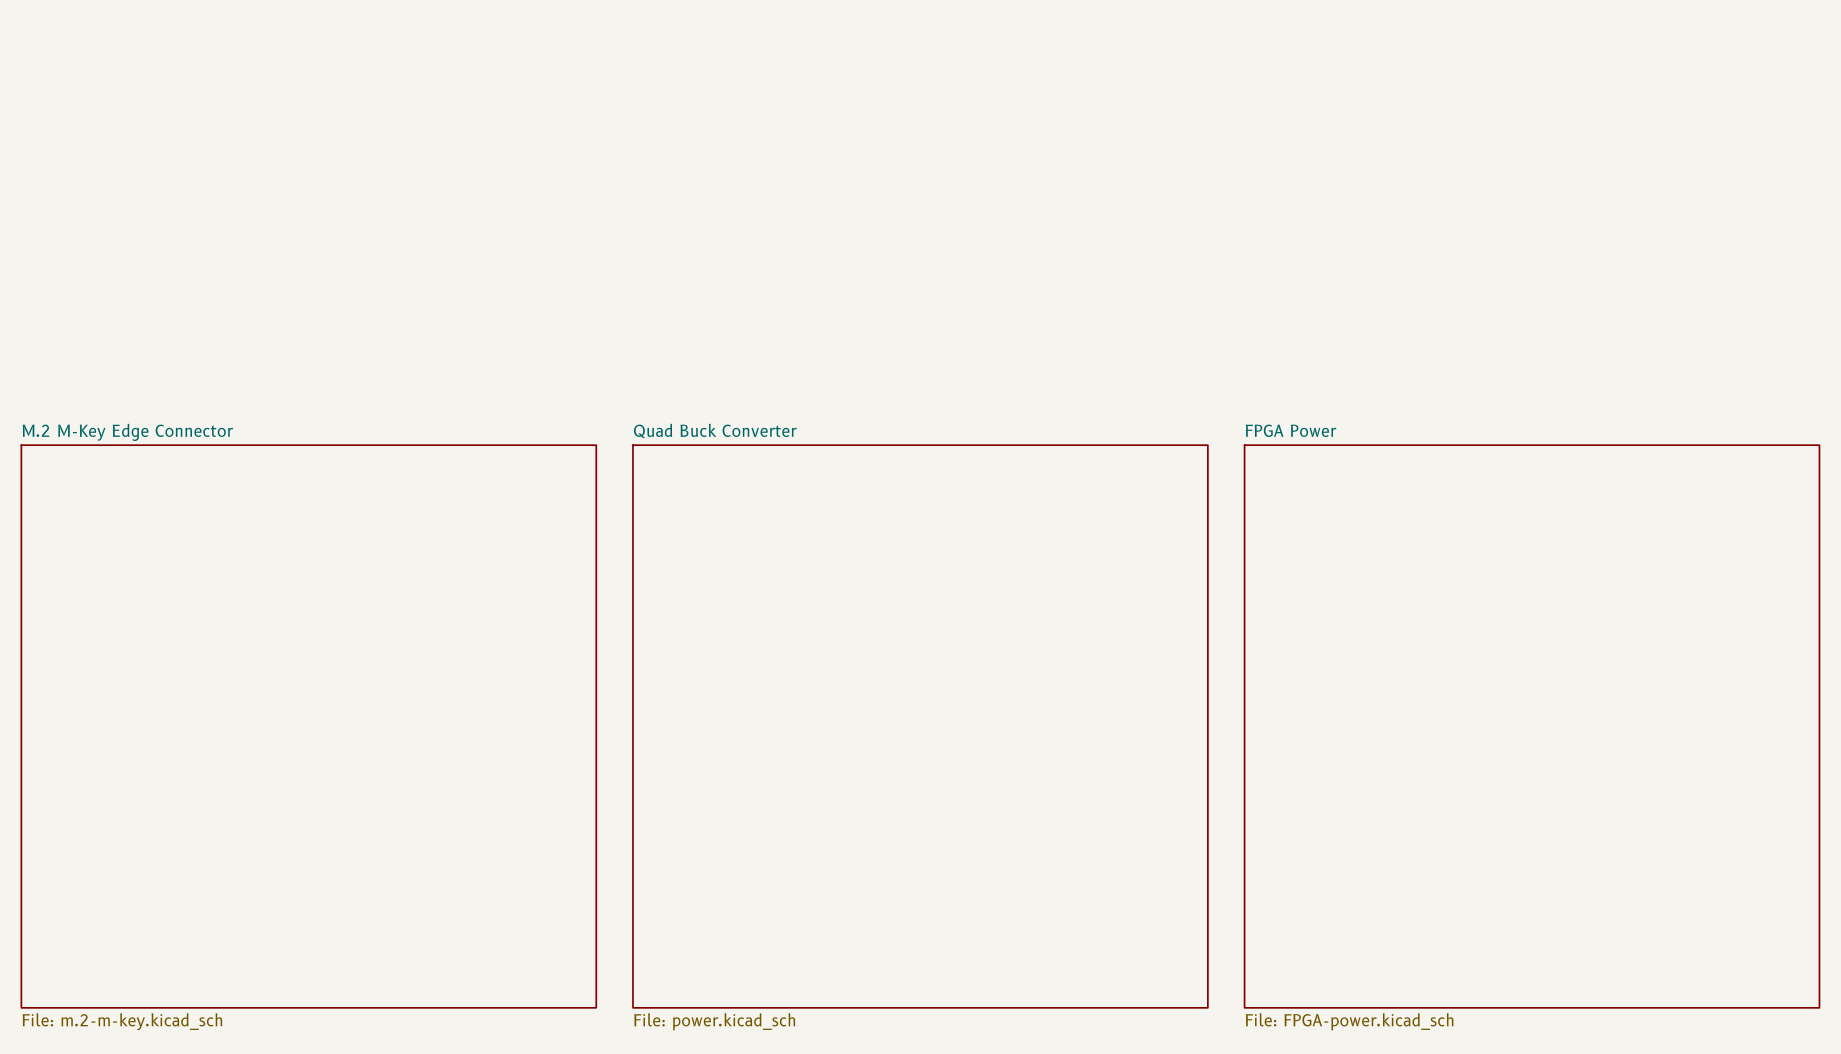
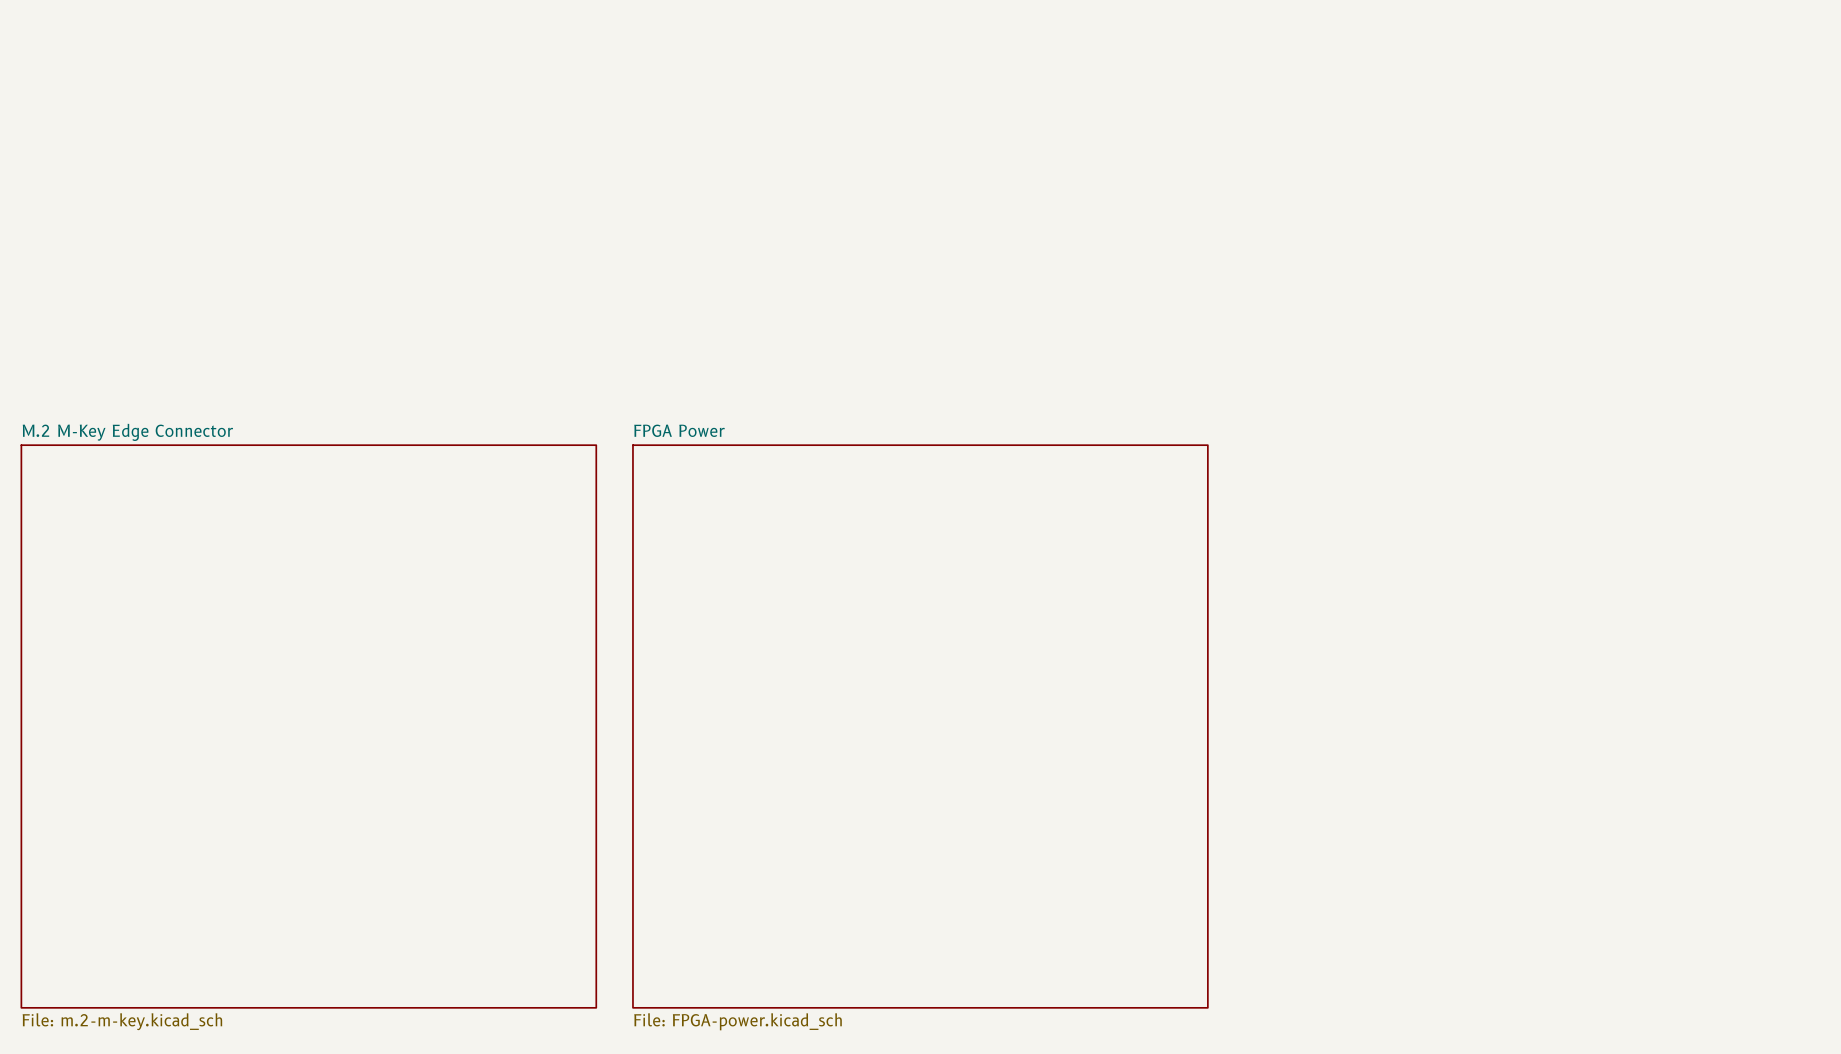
sheet Quad Buck Converter name: Quad Buck Converter (715, 430) -> FPGA Power (679, 430)
sheet FPGA Power: File: FPGA-power.kicad_sch (1532, 726) -> none
sheet Quad Buck Converter value: File: power.kicad_sch (714, 1021) -> File: FPGA-power.kicad_sch (738, 1021)

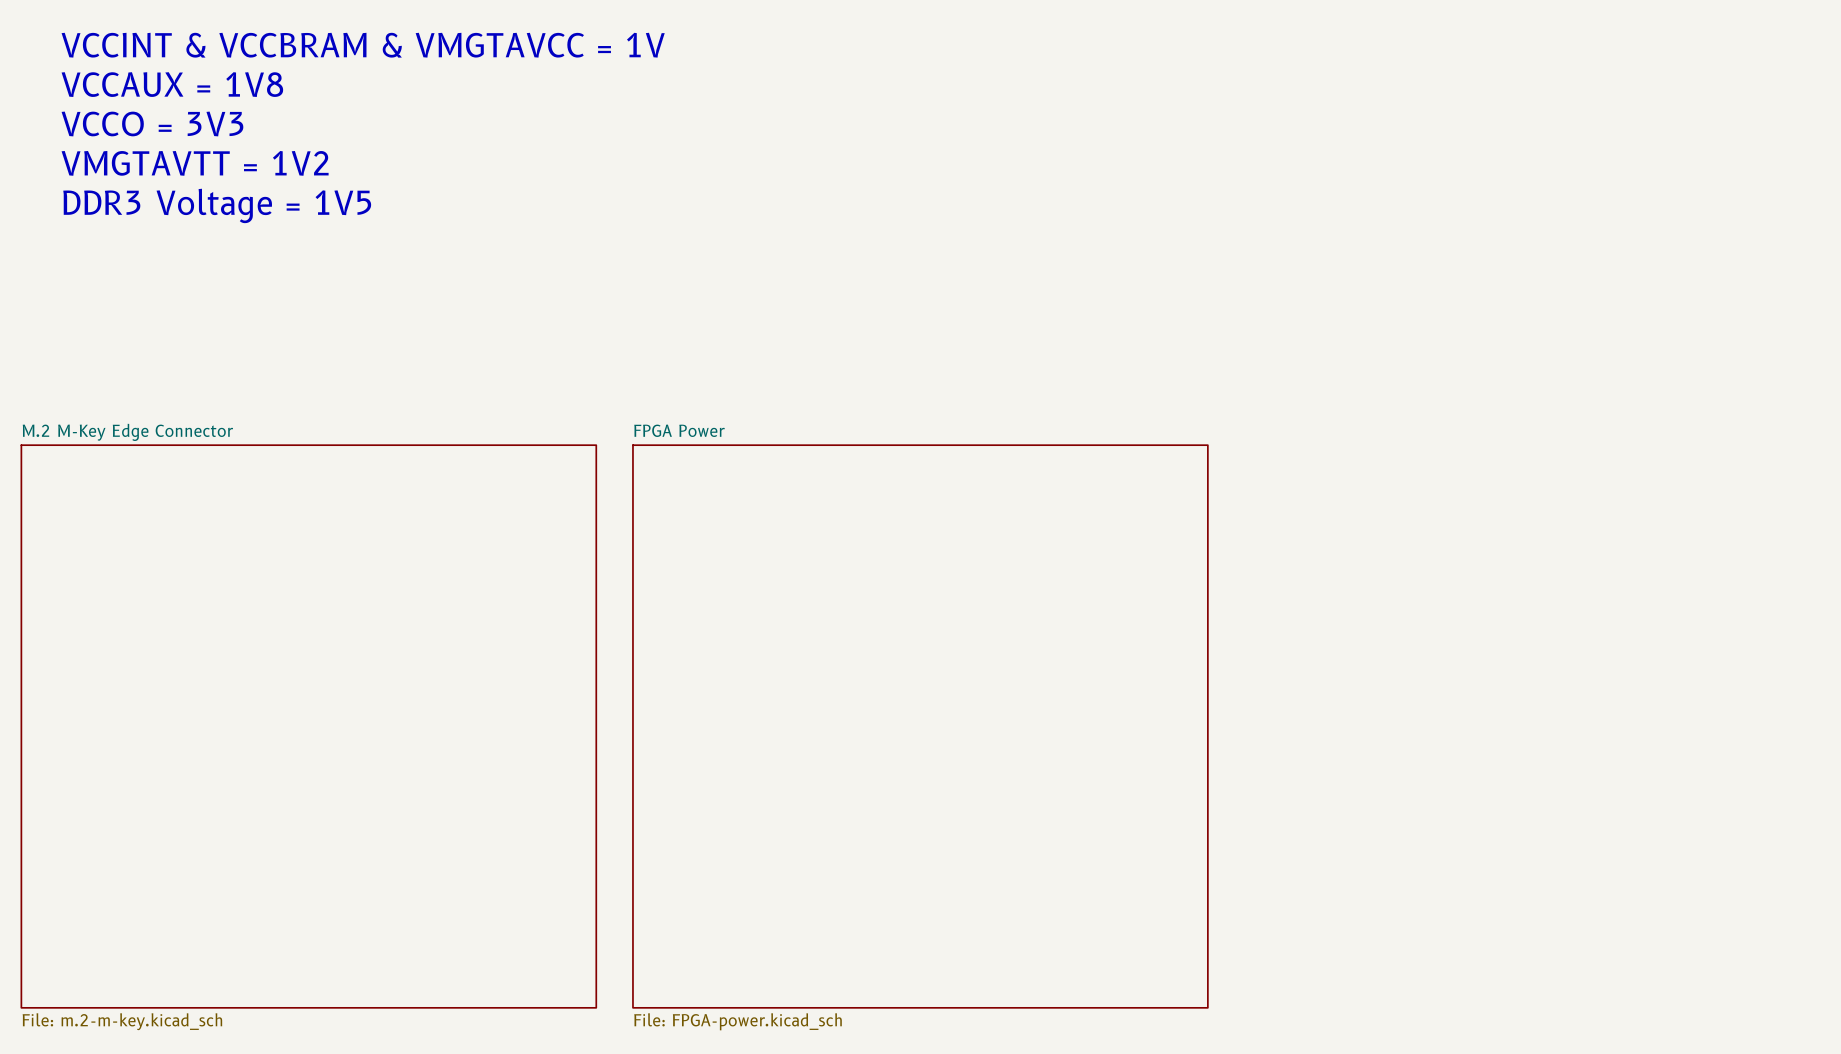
text: none -> VCCINT & VCCBRAM & VMGTAVCC = 1V (363, 45)
text: none -> VCCAUX = 1V8 (172, 84)
text: none -> VCCO = 3V3 (152, 123)
text: none -> VMGTAVTT = 1V2 (195, 163)
text: none -> DDR3 Voltage = 1V5 (217, 205)

